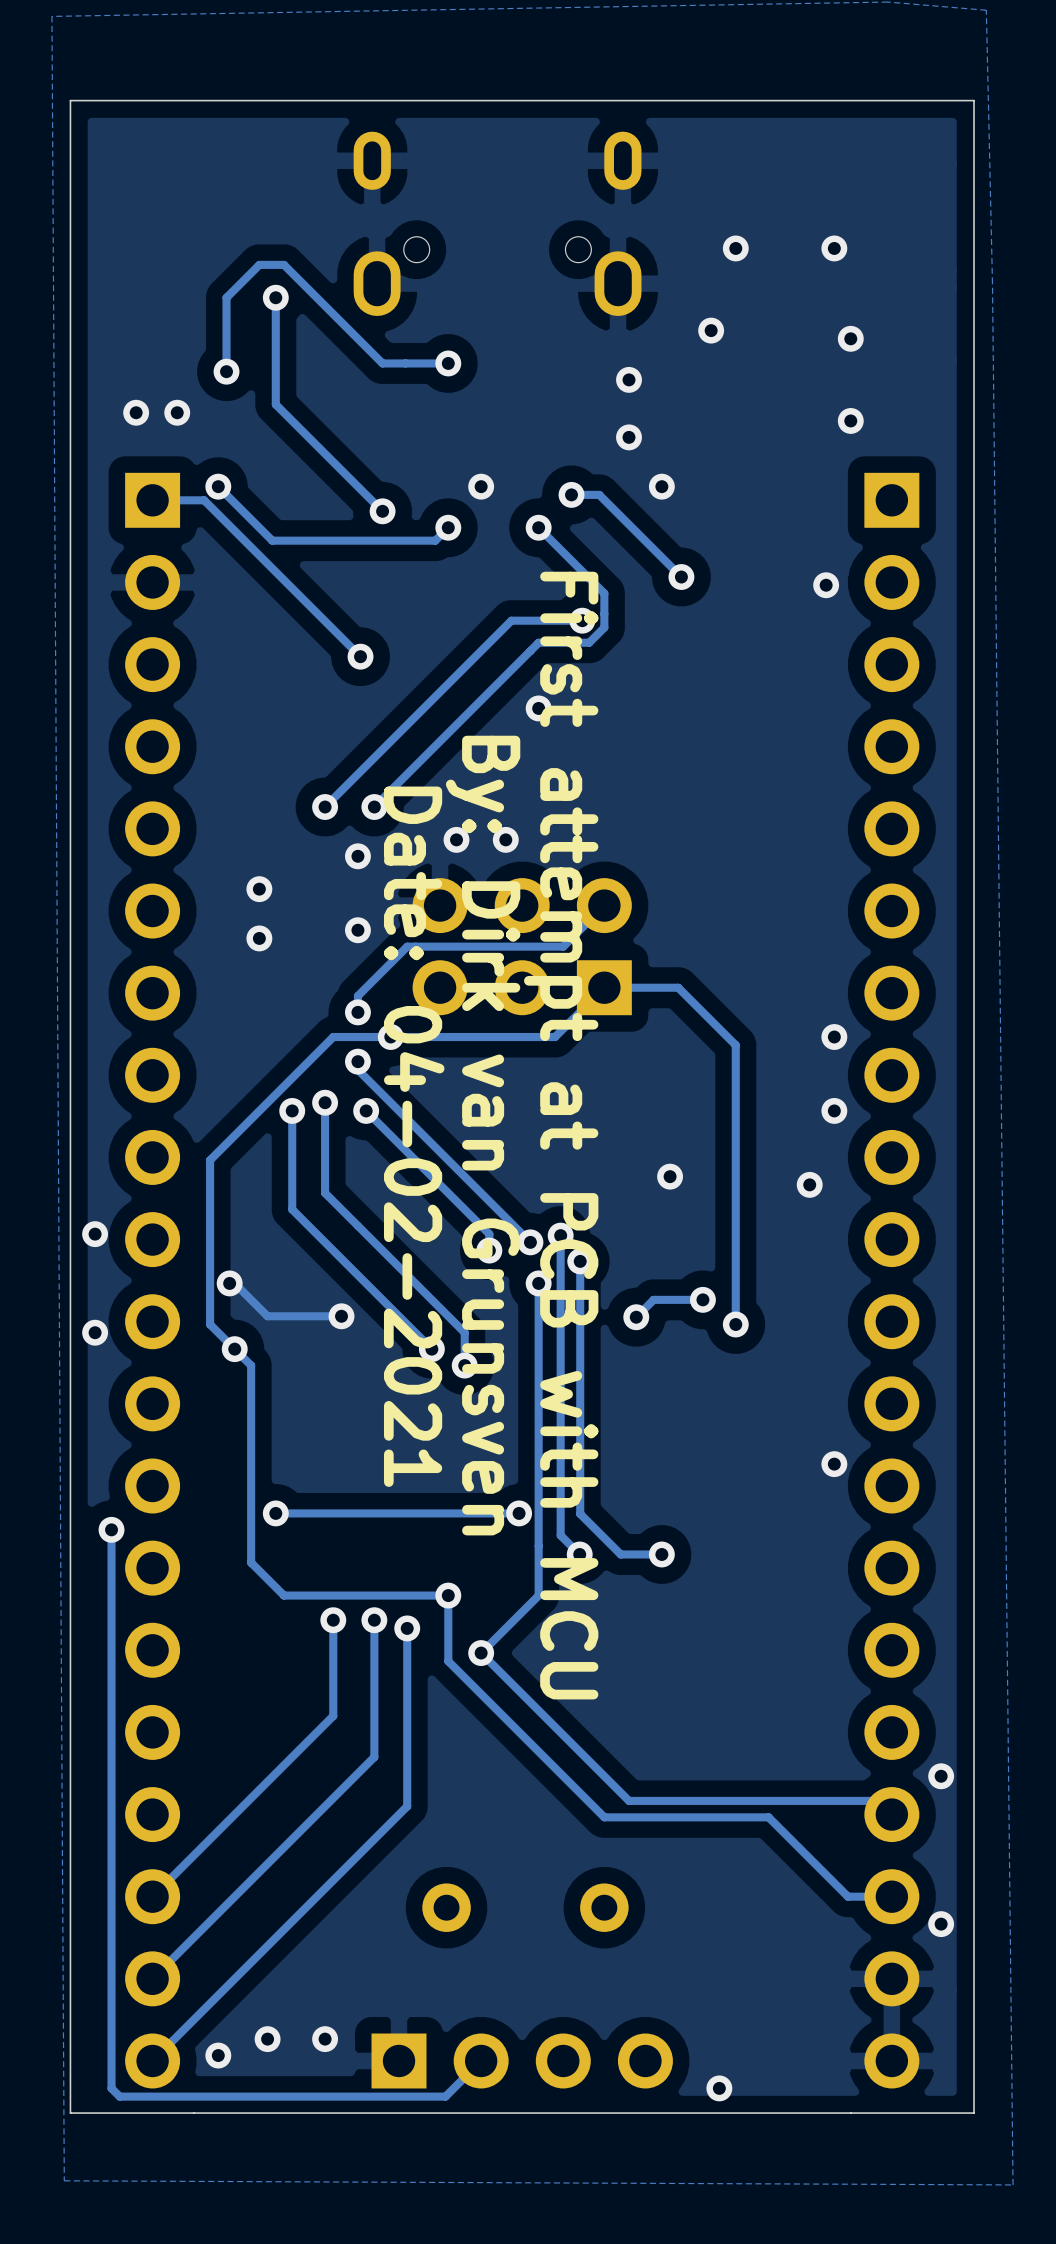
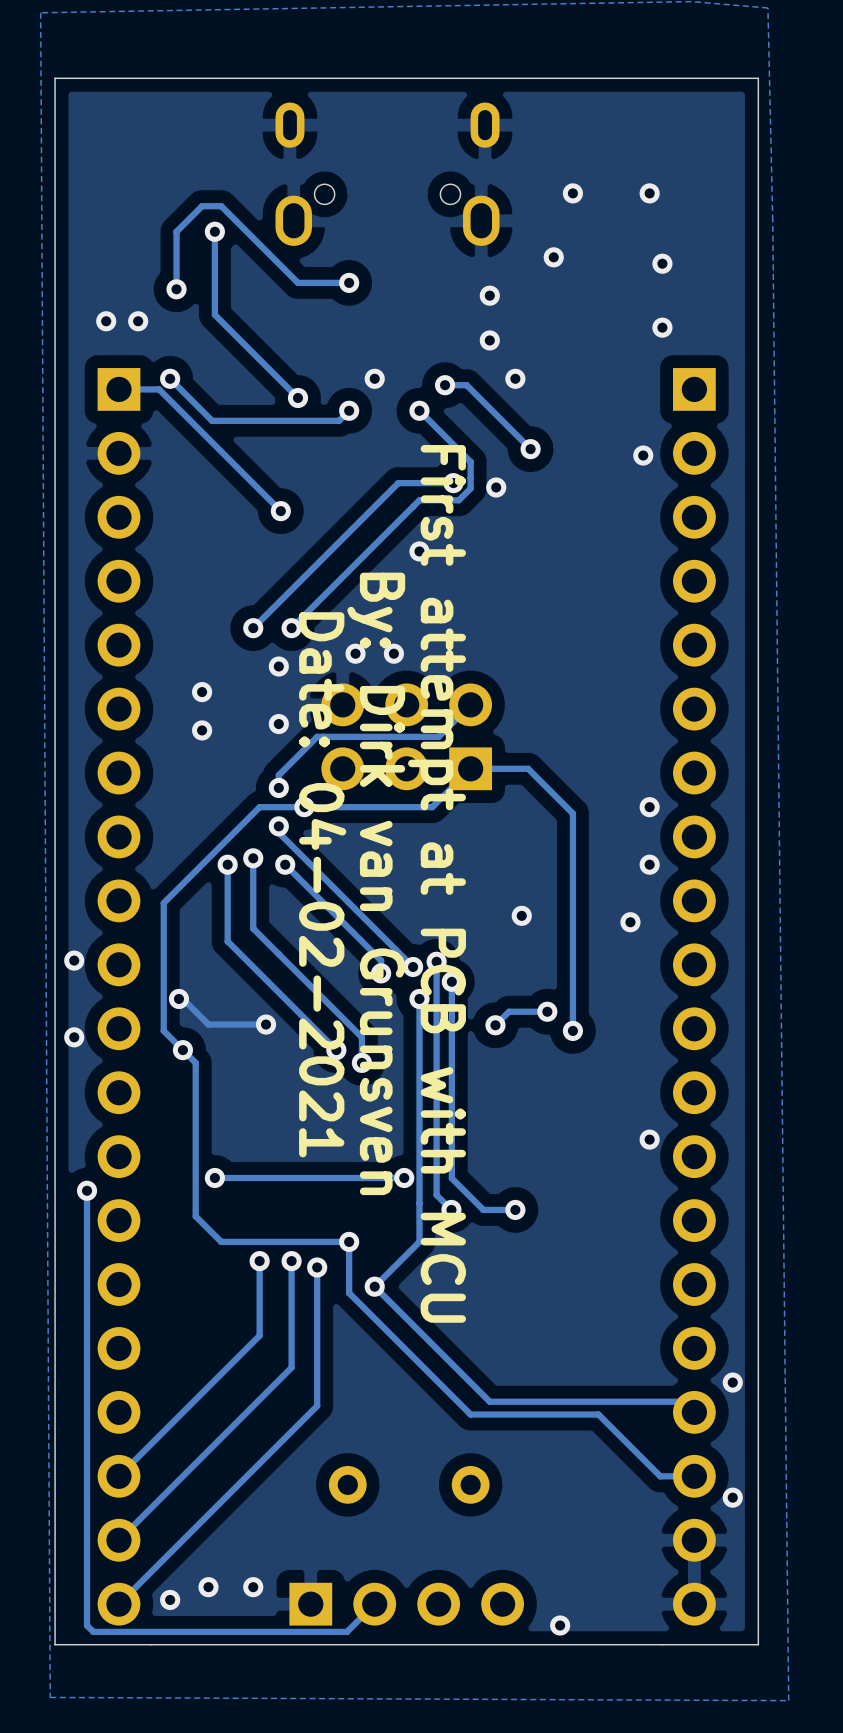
via: none -> (496, 487)

